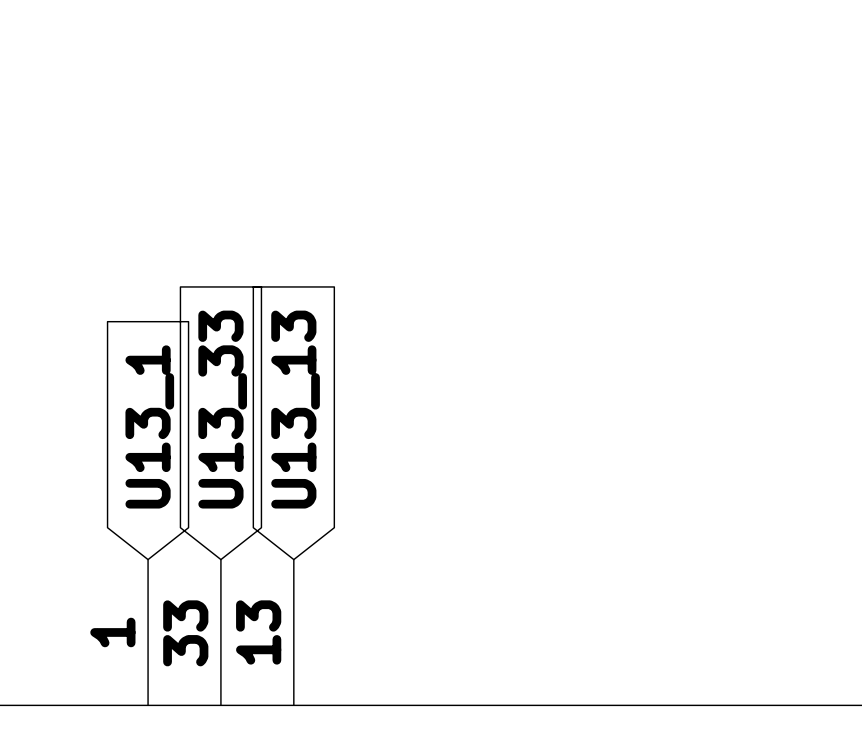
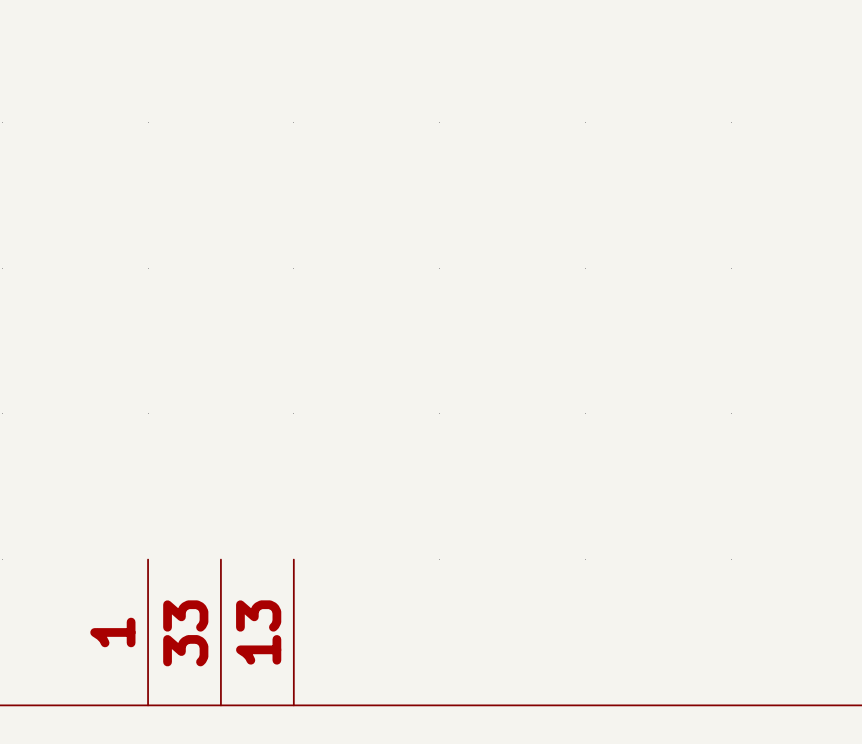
global label: U13_33 (222, 409) -> none
global label: U13_13 (295, 409) -> none
global label: U13_1 (149, 426) -> none

